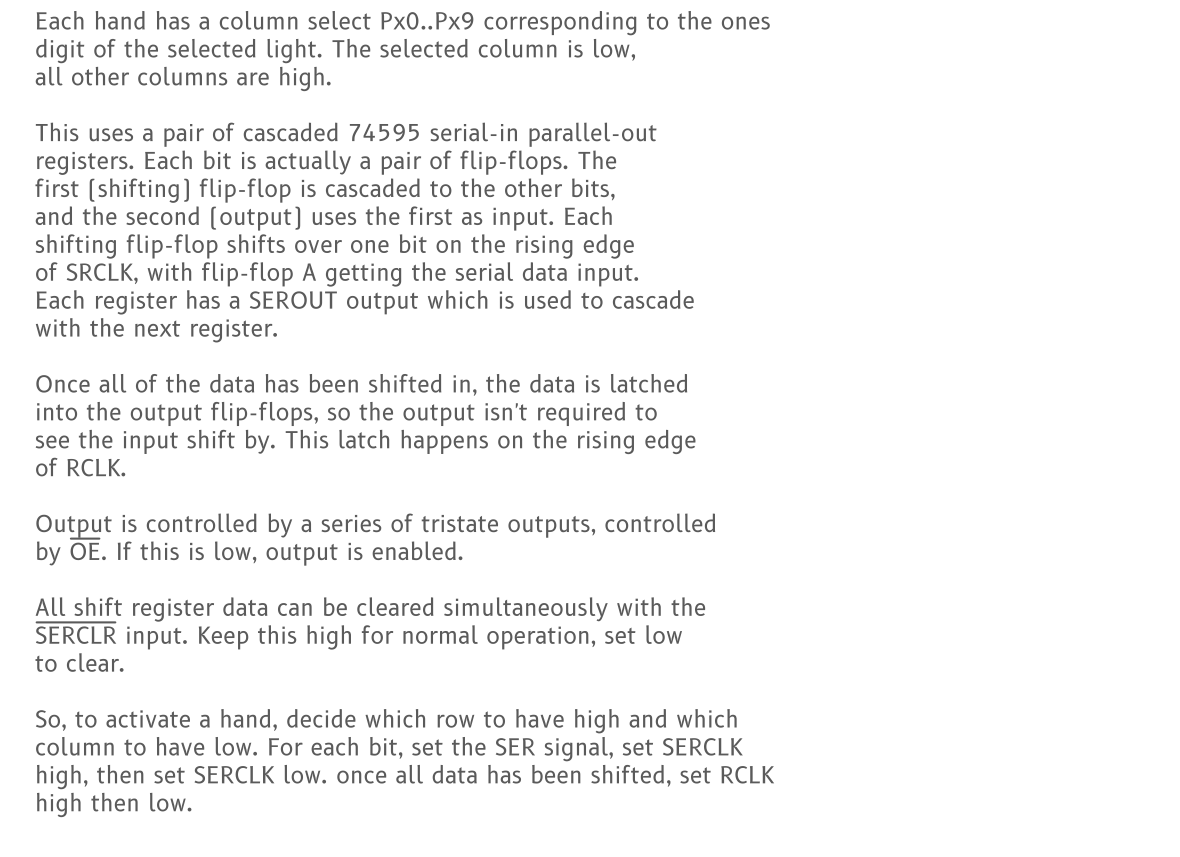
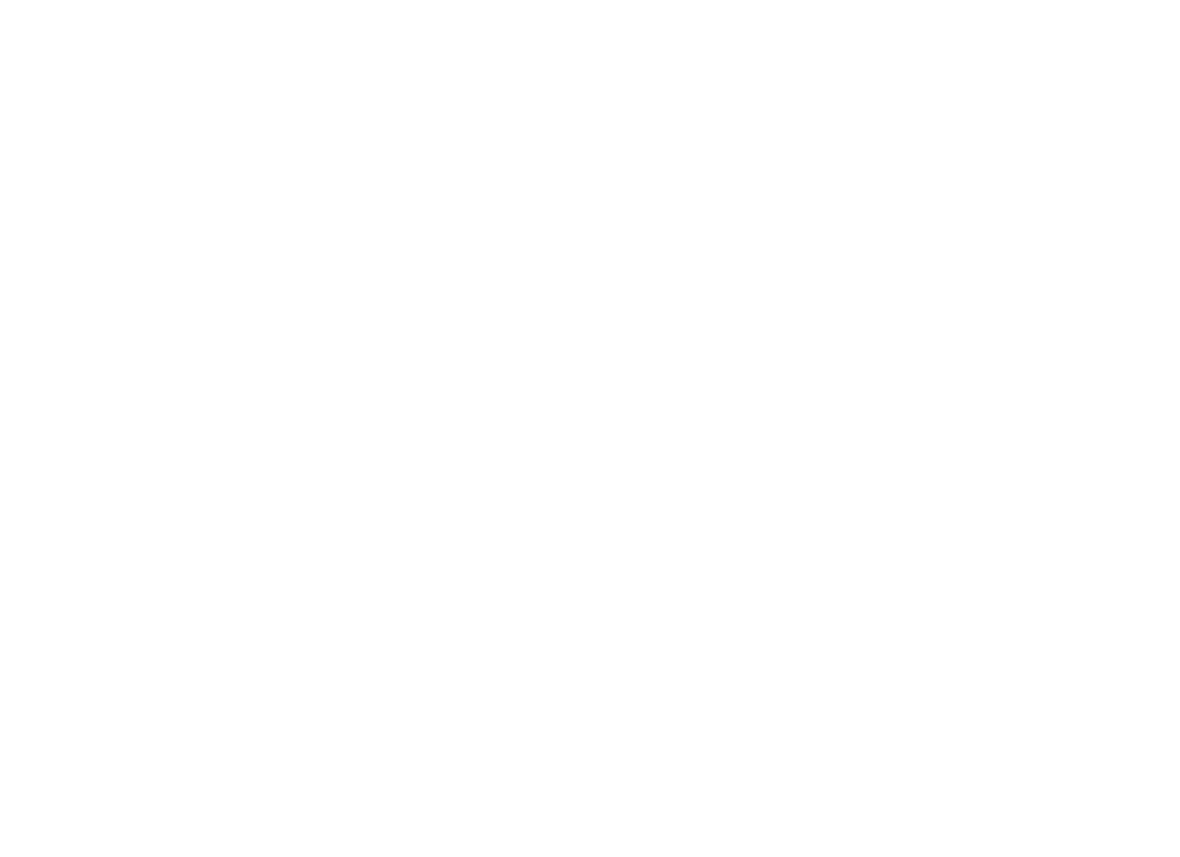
text: Each hand has a column select Px0..Px9 corresponding to the ones (403, 23) -> none
text: digit of the selected light. The selected column is low, (335, 51) -> none
text: all other columns are high. (183, 78) -> none
text: This uses a pair of cascaded 74595 serial-in parallel-out (346, 134) -> none
text: registers. Each bit is actually a pair of flip-flops. The (326, 162) -> none
text: first (shifting) flip-flop is cascaded to the other bits, (325, 190) -> none
text: and the second (output) uses the first as input. Each (323, 218) -> none
text: shifting flip-flop shifts over one bit on the rising edge (334, 246) -> none
text: of SRCLK, with flip-flop A getting the serial data input. (337, 274) -> none
text: Each register has a SEROUT output which is used to cascade (365, 302) -> none
text: with the next register. (156, 330) -> none
text: Once all of the data has been shifted in, the data is latched (361, 384) -> none
text: into the output flip-flops, so the output isn't required to (346, 413) -> none
text: see the input shift by. This latch happens on the rising edge (365, 441) -> none
text: of RCLK. (80, 467) -> none
text: Output is controlled by a series of tristate outputs, controlled (375, 525) -> none
text: by ~{OE}. If this is low, output is enabled. (249, 552) -> none
text: All shift register data can be cleared simultaneously with the (370, 609) -> none
text: ~{SERCLR} input. Keep this high for normal operation, set low (358, 636) -> none
text: to clear. (79, 662) -> none
text: So, to activate a hand, decide which row to have high and which (386, 721) -> none
text: column to have low. For each bit, set the SER signal, set SERCLK (389, 749) -> none
text: high, then set SERCLK low. once all data has been shifted, set RCLK (405, 777) -> none
text: high then low. (114, 804) -> none

